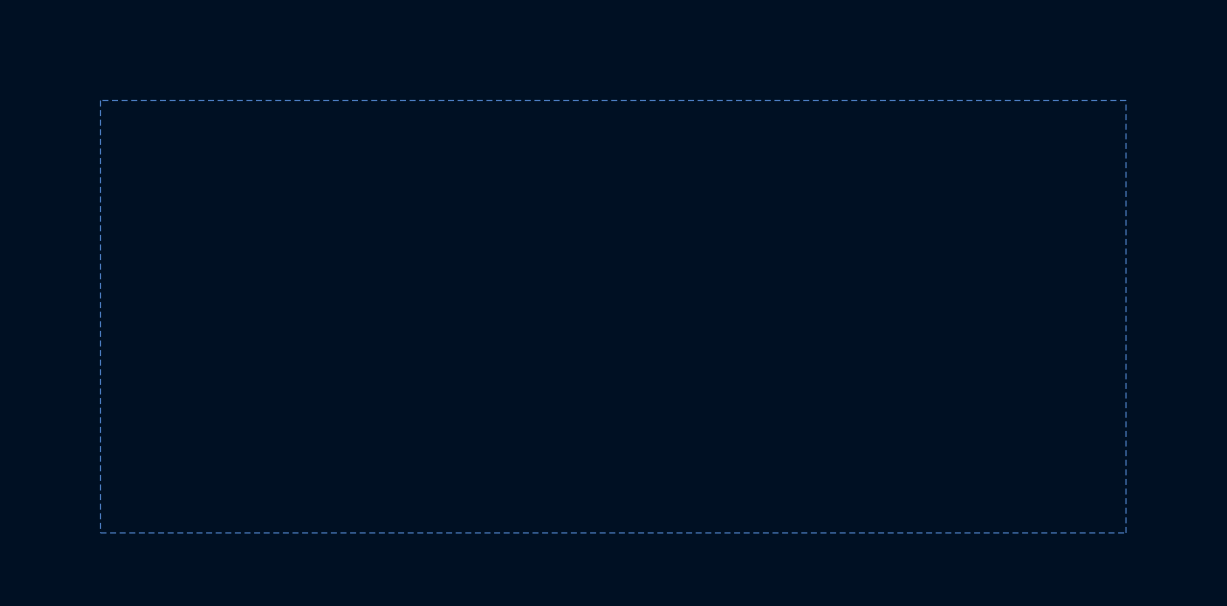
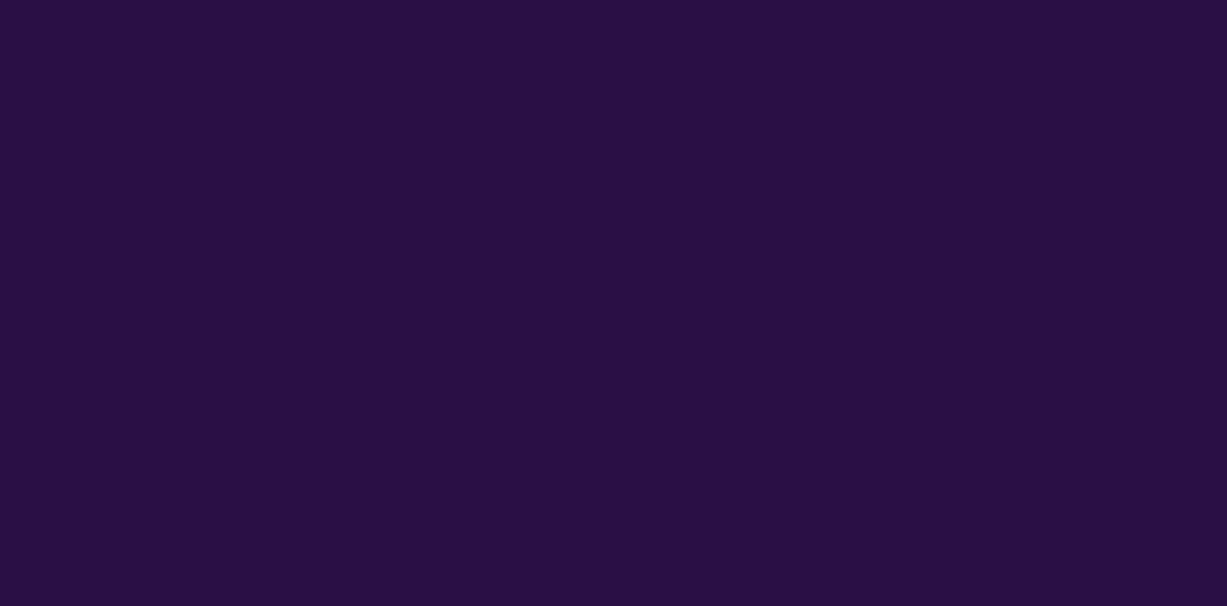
zone outline: (1126, 100) (100, 100) (100, 532) (1126, 532) (1126, 100) -> none

